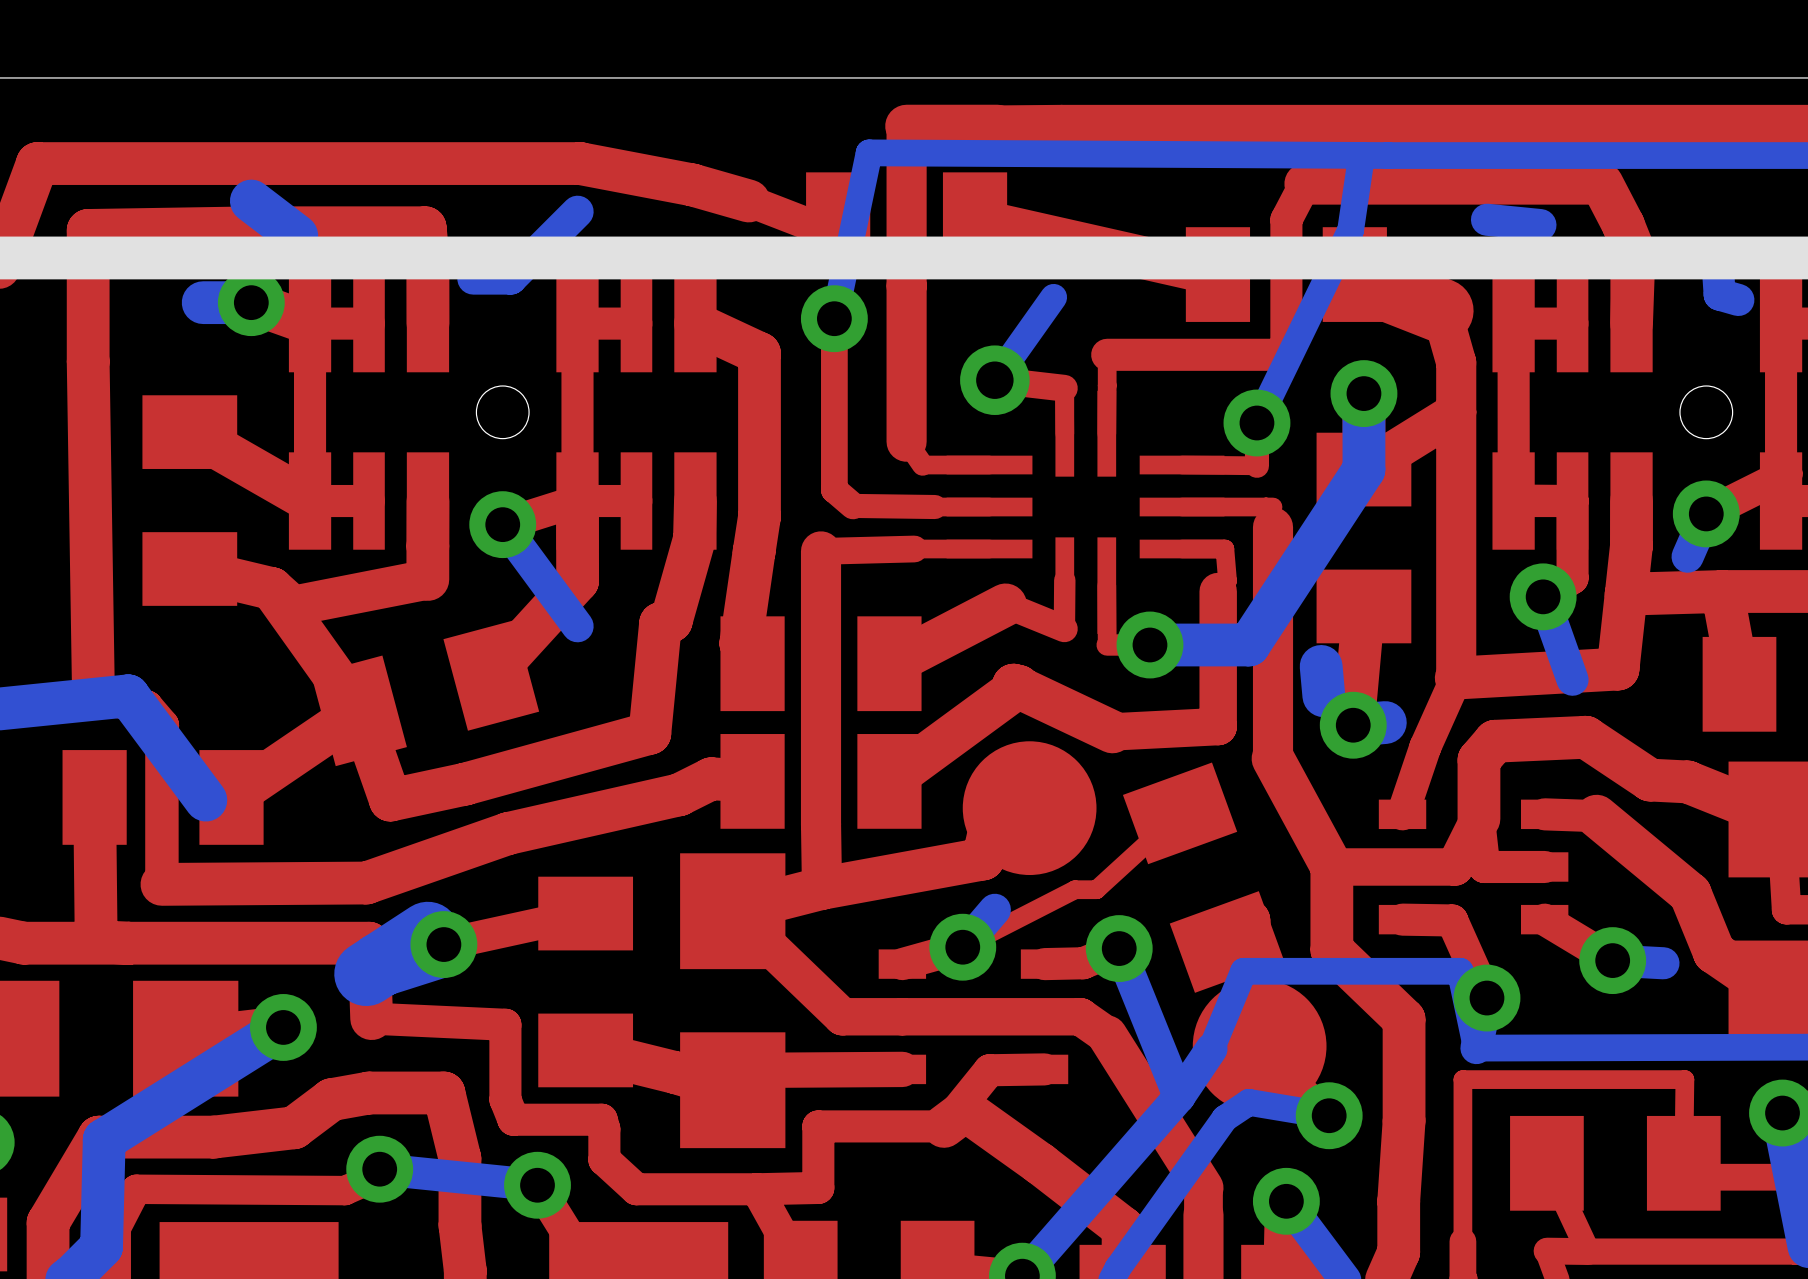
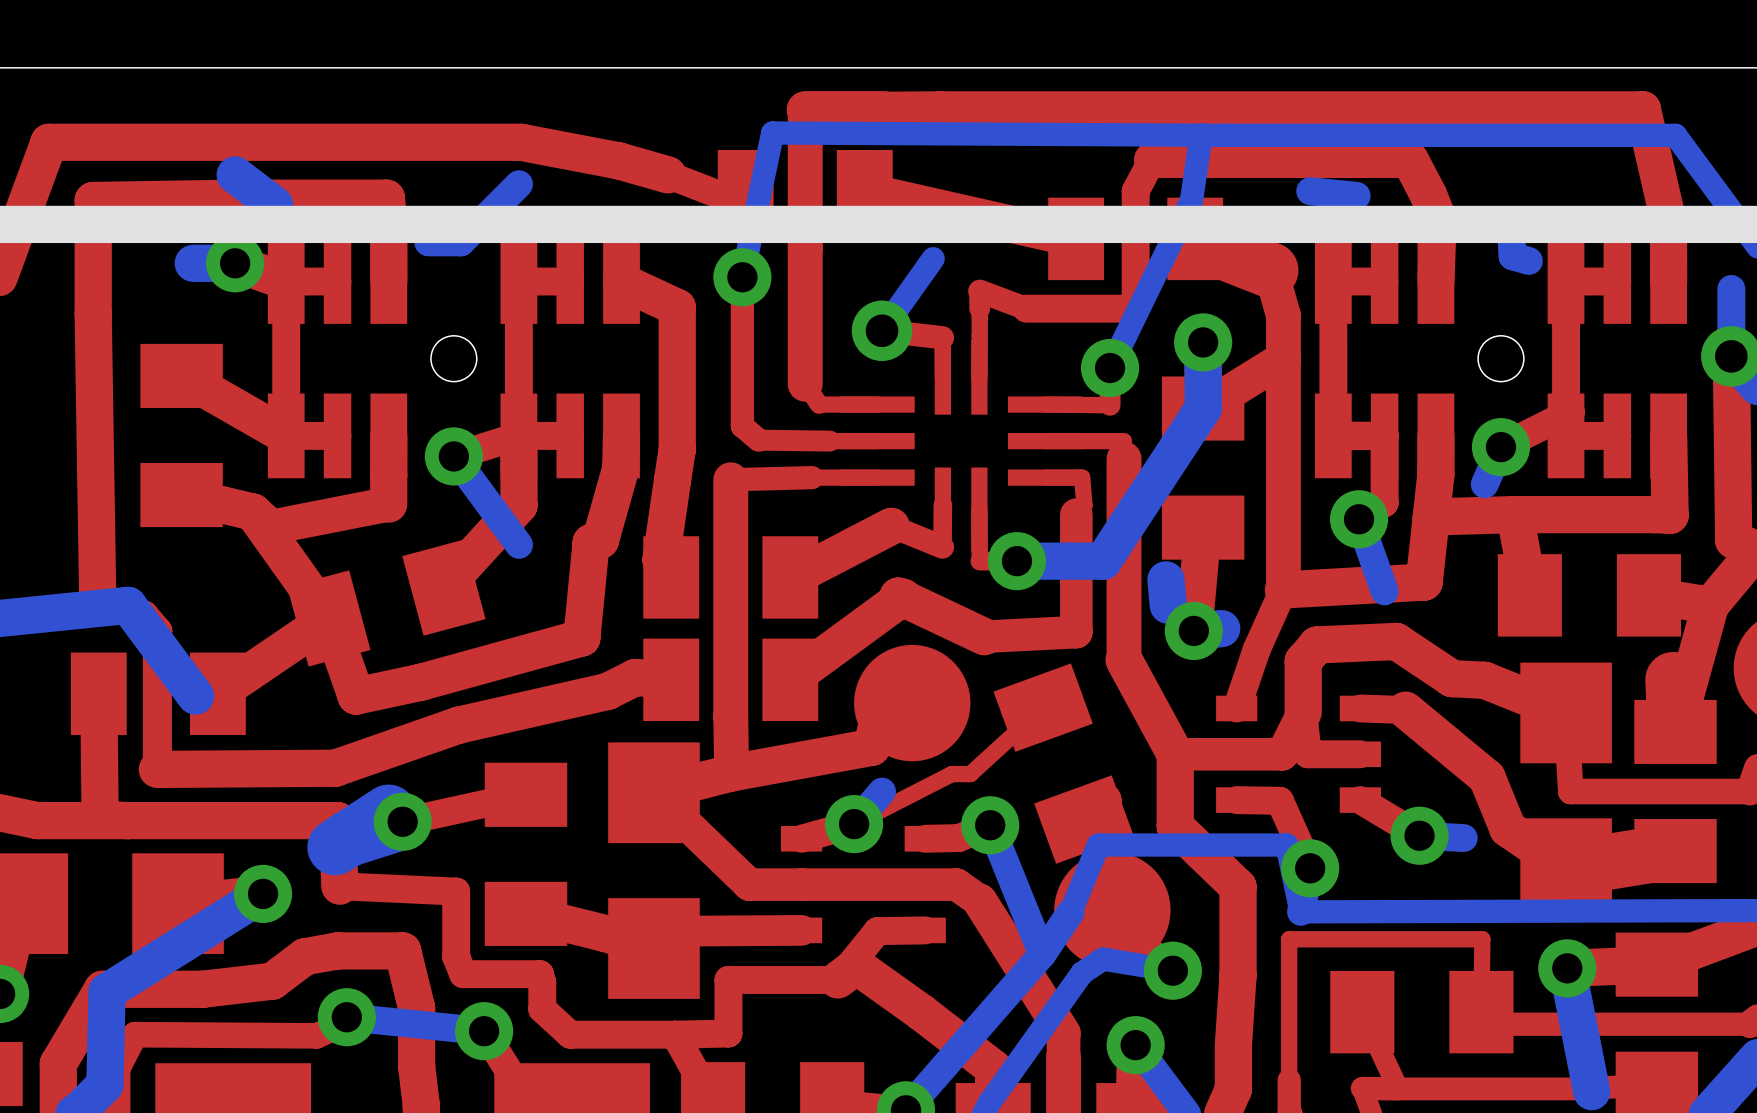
top track: (1160, 354) (1107, 354) -> (1026, 308) (979, 291) (979, 308)

